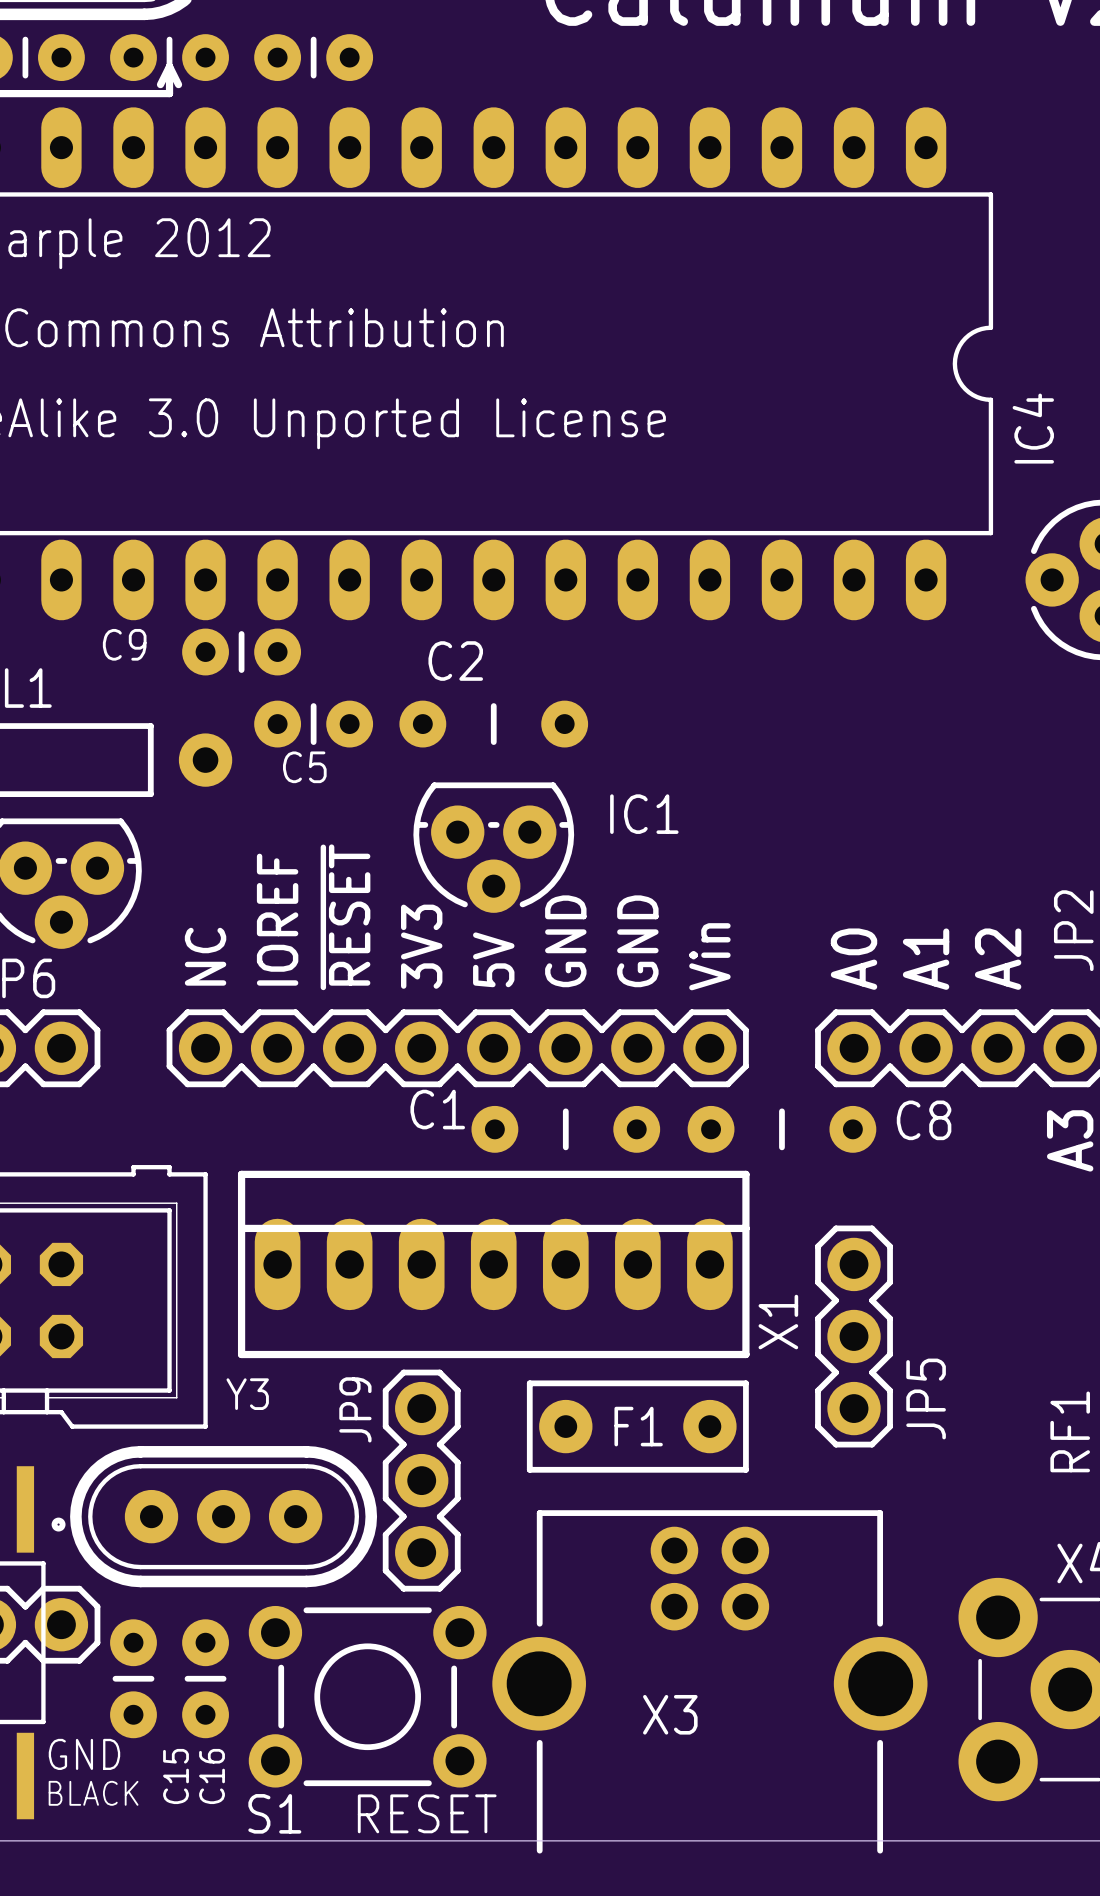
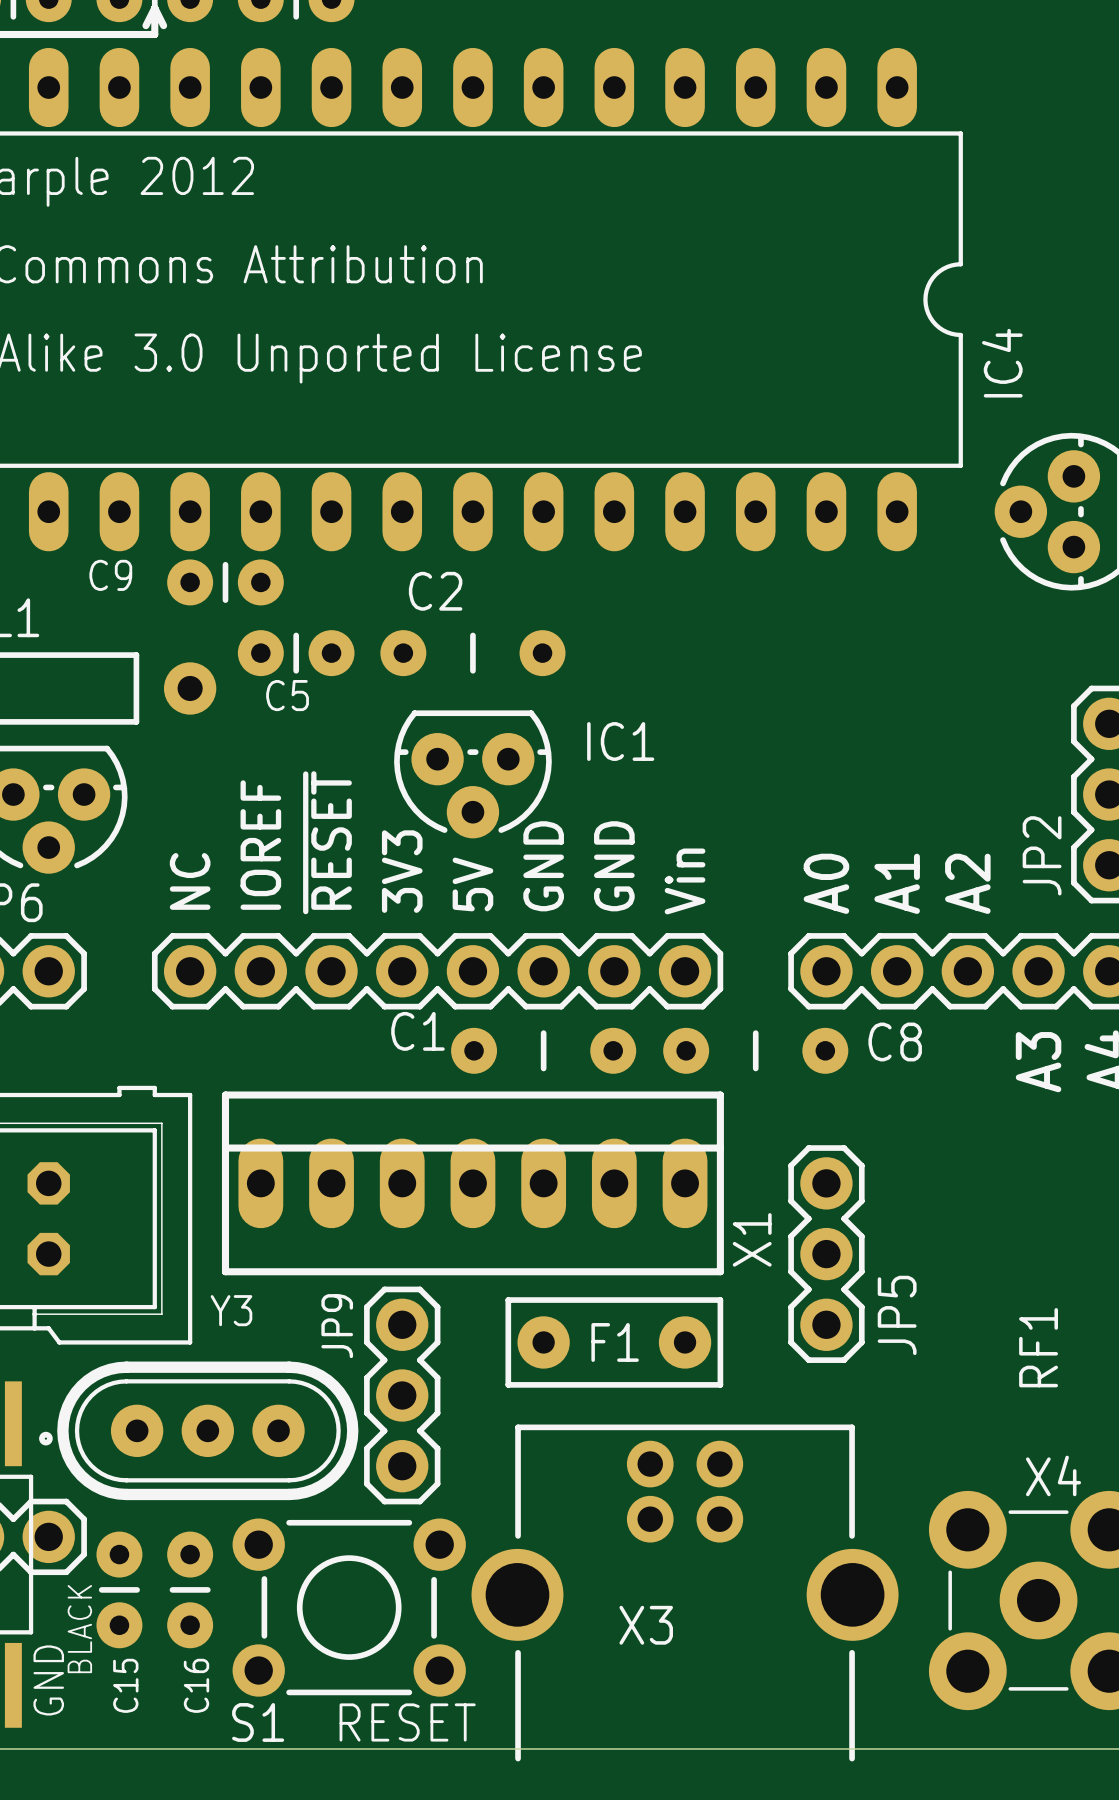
text rotation: 0° (84, 1754) -> 90° counterclockwise (48, 1680)
C15 name position: C15 (176, 1776) -> C15 (125, 1685)
text rotation: 0° (93, 1793) -> 90° counterclockwise (79, 1629)

